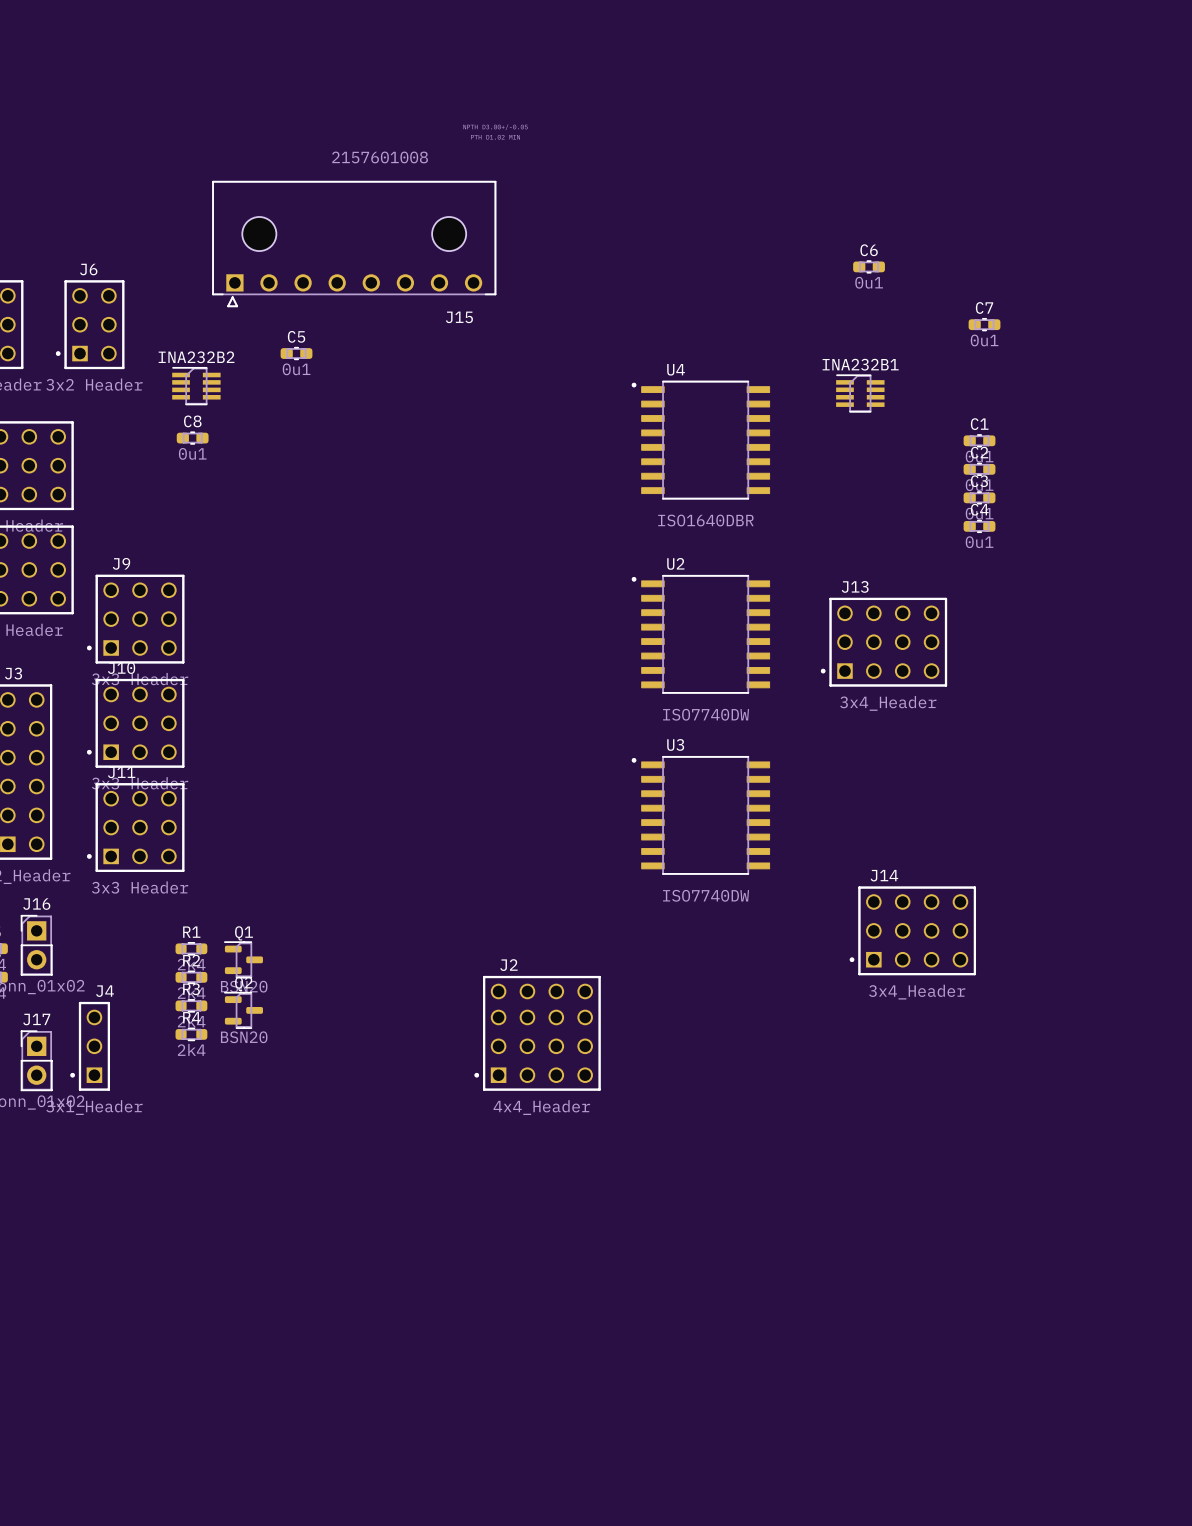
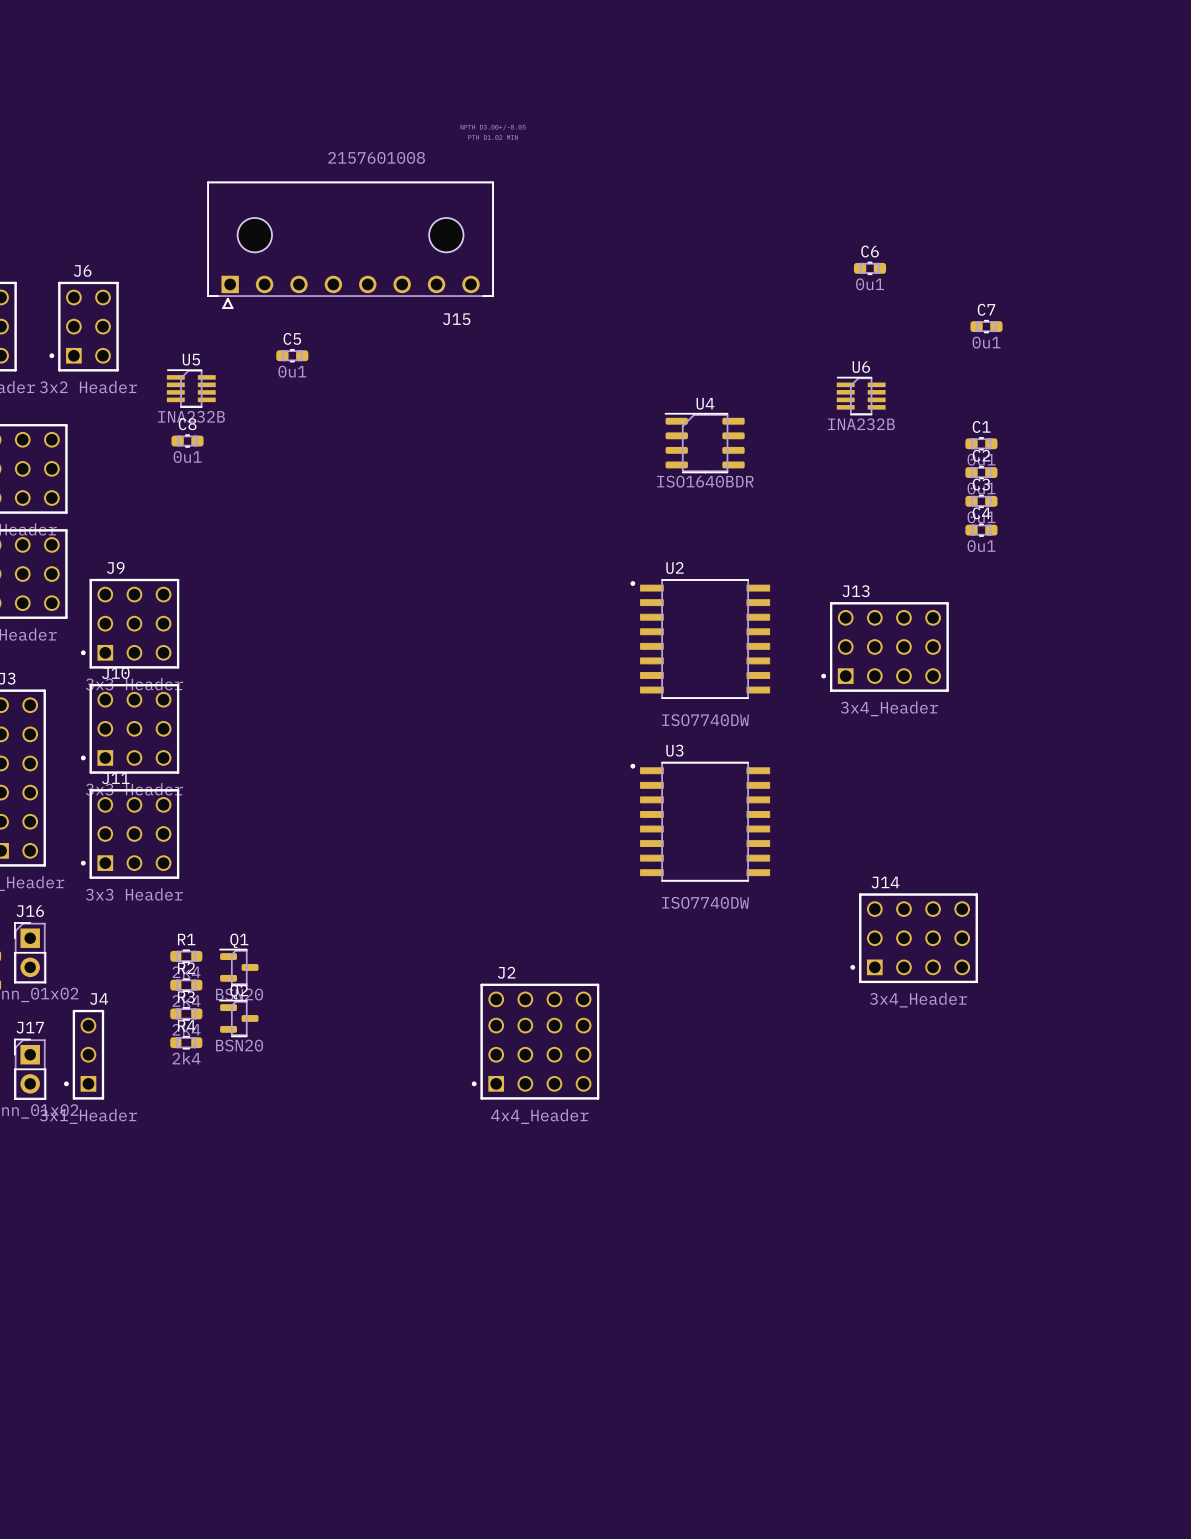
INA232B2 name: INA232B2 (196, 357) -> U5 (191, 359)
INA232B1 name: INA232B1 (860, 364) -> U6 (861, 367)
U4 name position: U4 (676, 369) -> U4 (705, 403)
U4 footprint: [631, 380, 771, 500] -> [664, 413, 745, 474]
INA232B2 value: none -> INA232B (191, 416)
INA232B1 value: none -> INA232B (861, 424)
U4 value: ISO1640DBR (705, 520) -> ISO1640BDR (705, 481)

